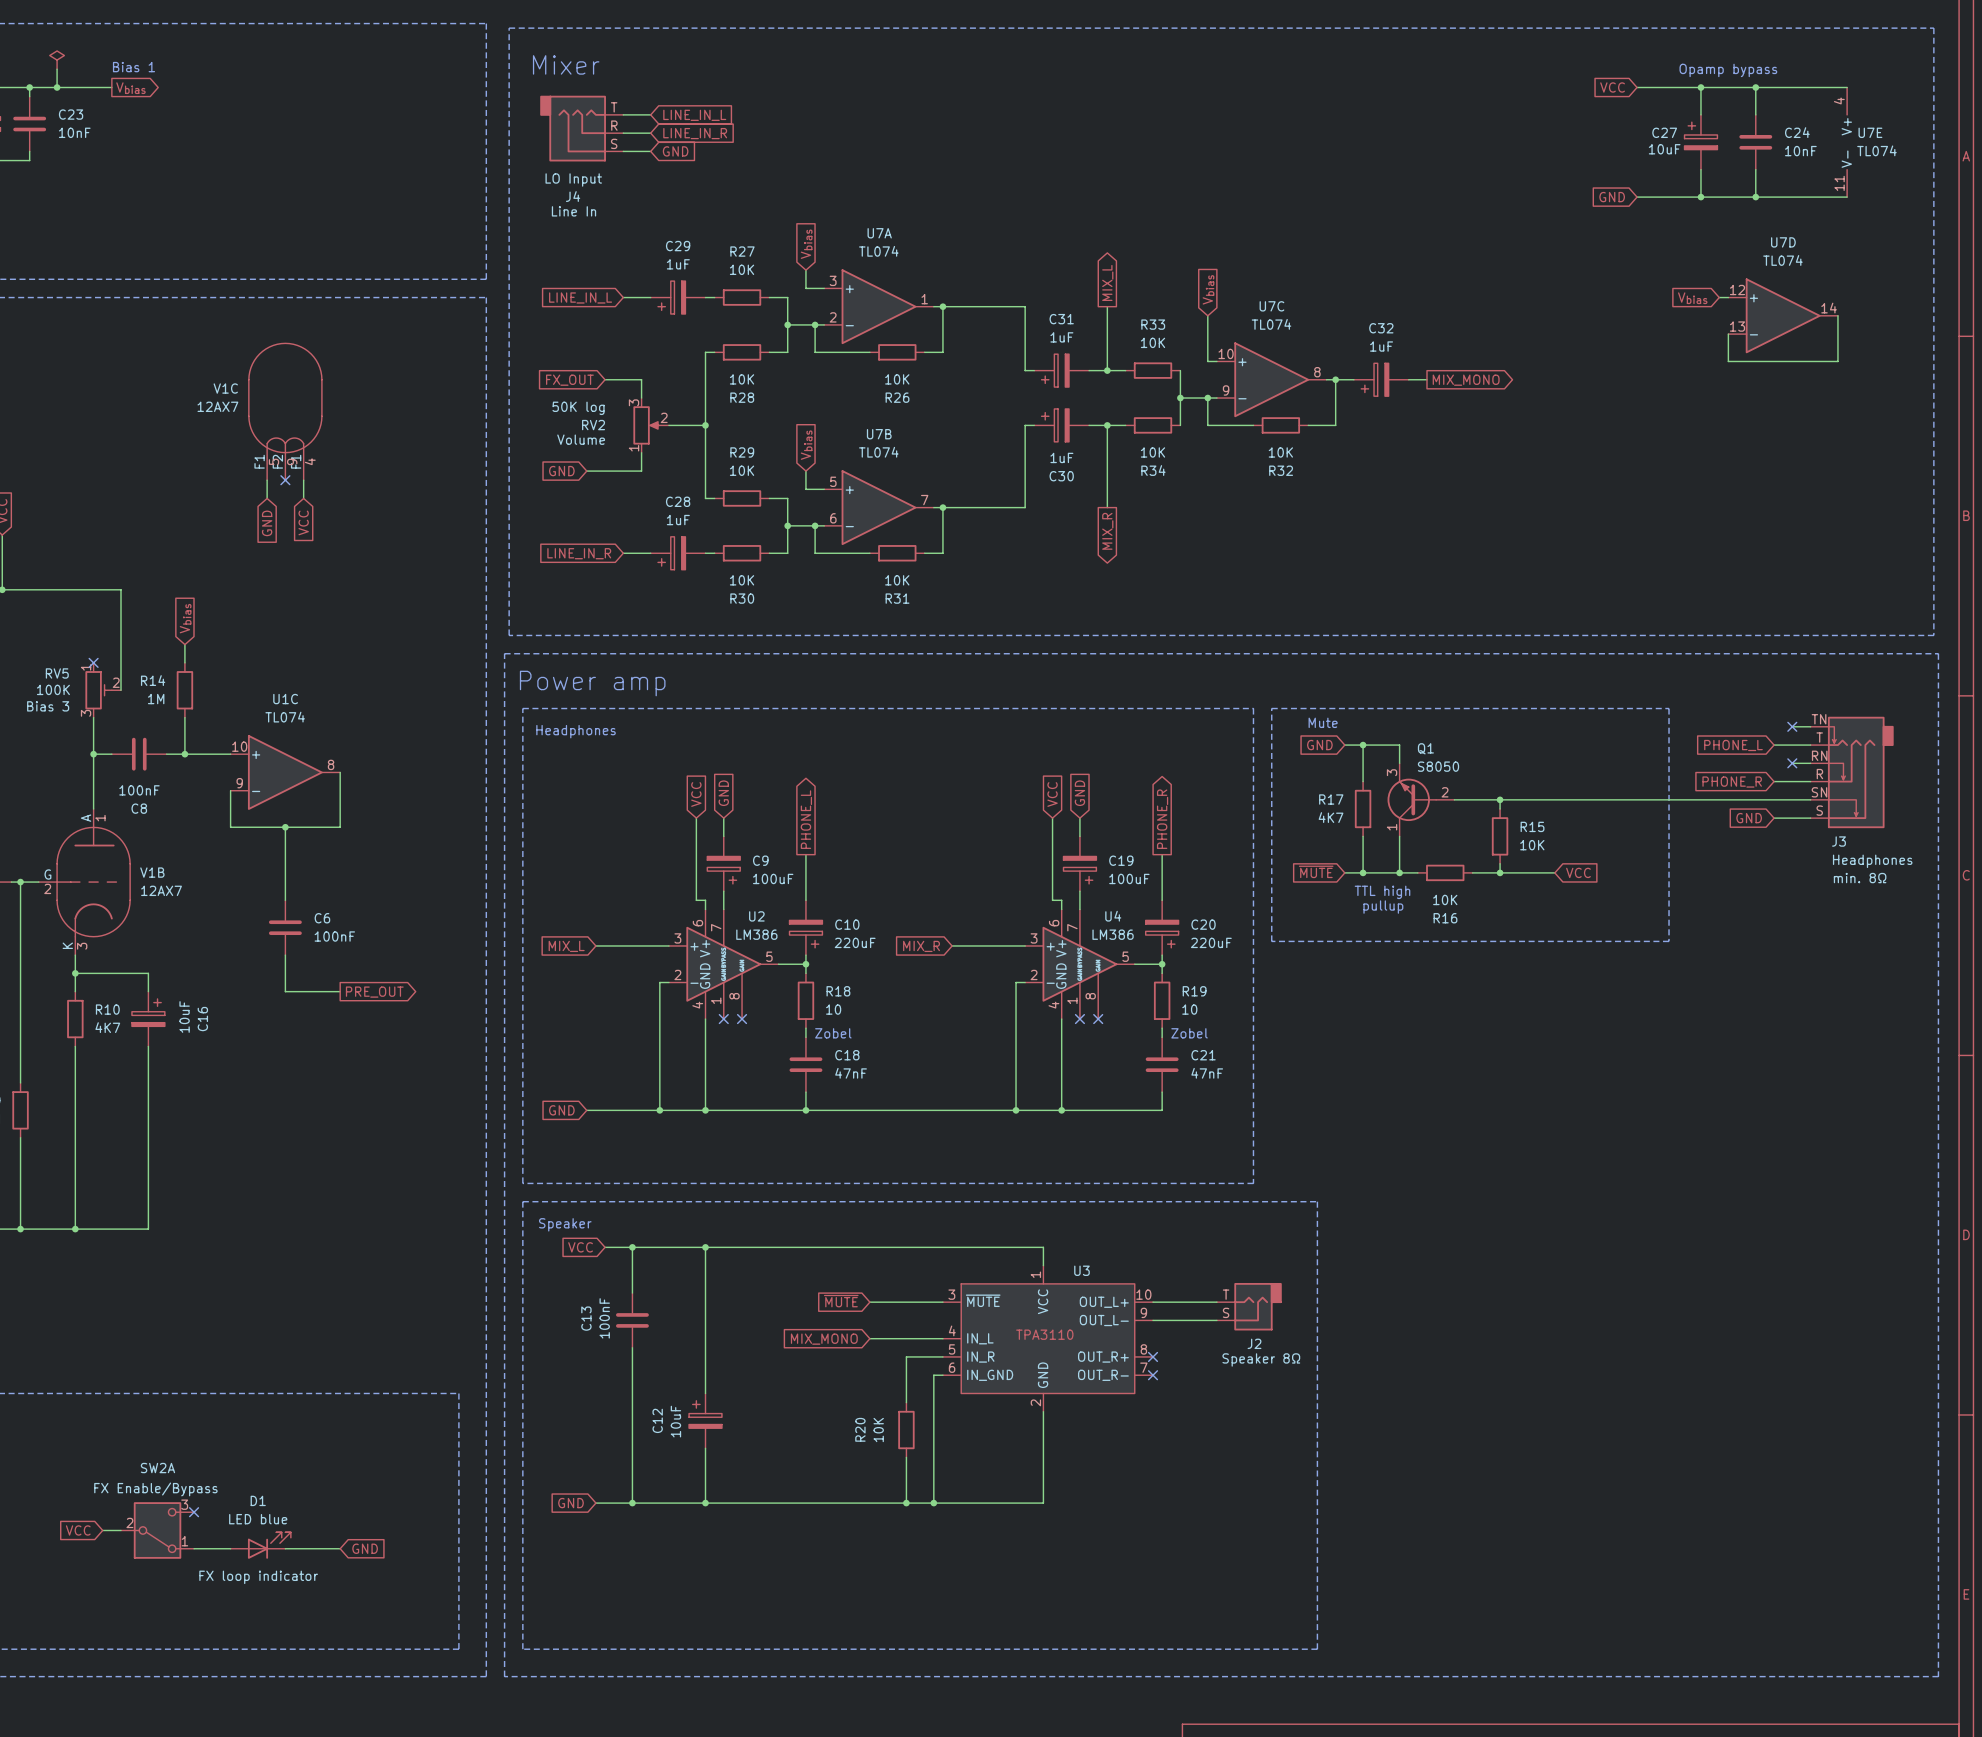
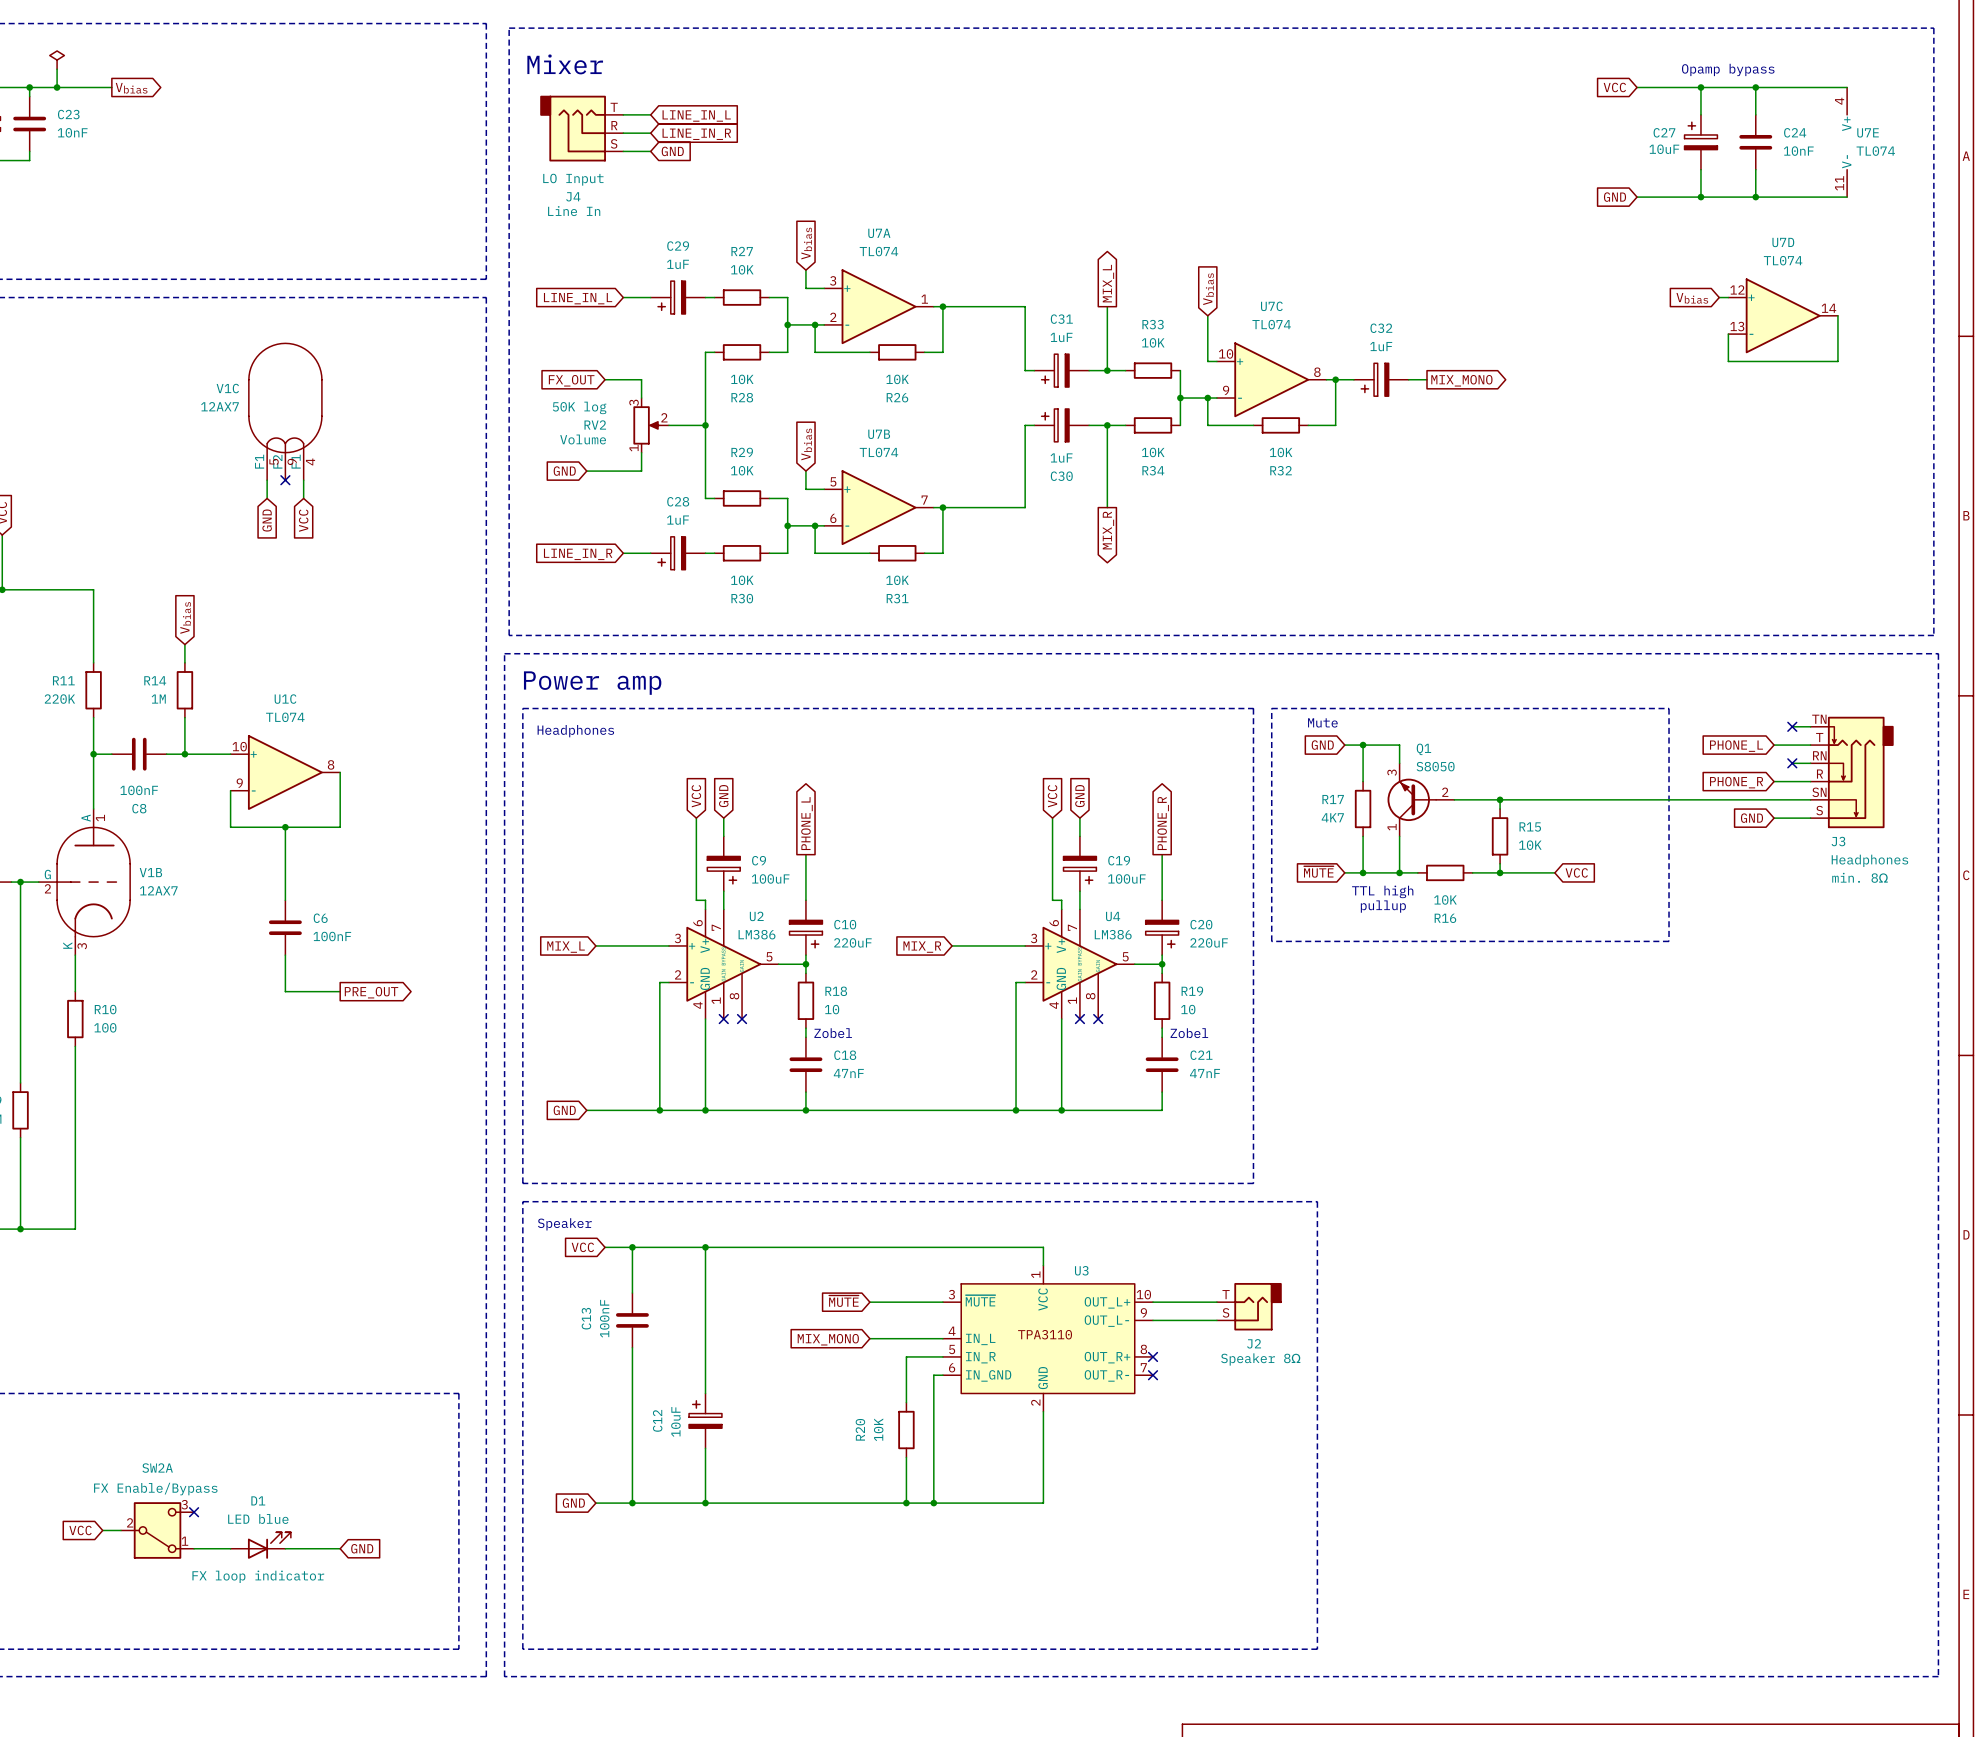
text: Bias 1 (134, 67) -> none
wire: (93, 589) (121, 589) (121, 690) -> (93, 589) (93, 662)
no-connect mark: (93, 662) -> none
R11: none -> 220K (93, 690)
RV5: 100K (103, 690) -> none
wire: (75, 973) (148, 973) (148, 991) -> none
junction: (75, 973) -> none
C16: 10uF (148, 1019) -> none
R10 value: 4K7 (107, 1027) -> 100 (105, 1027)
wire: (148, 1046) (148, 1229) (75, 1229) -> none
junction: (75, 1229) -> none

